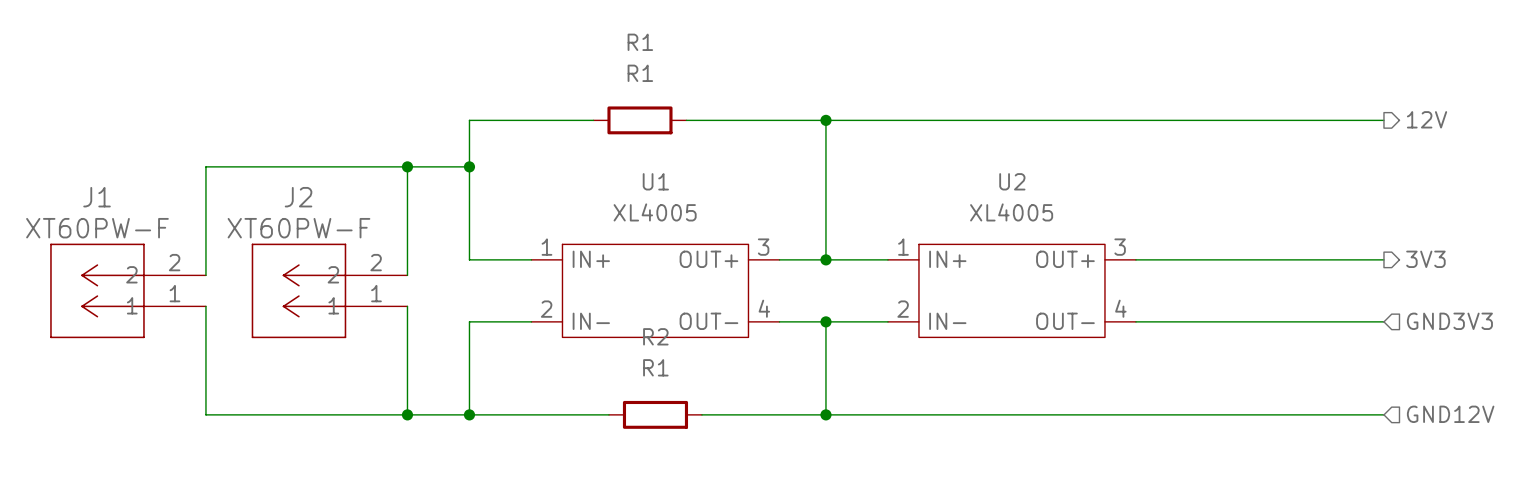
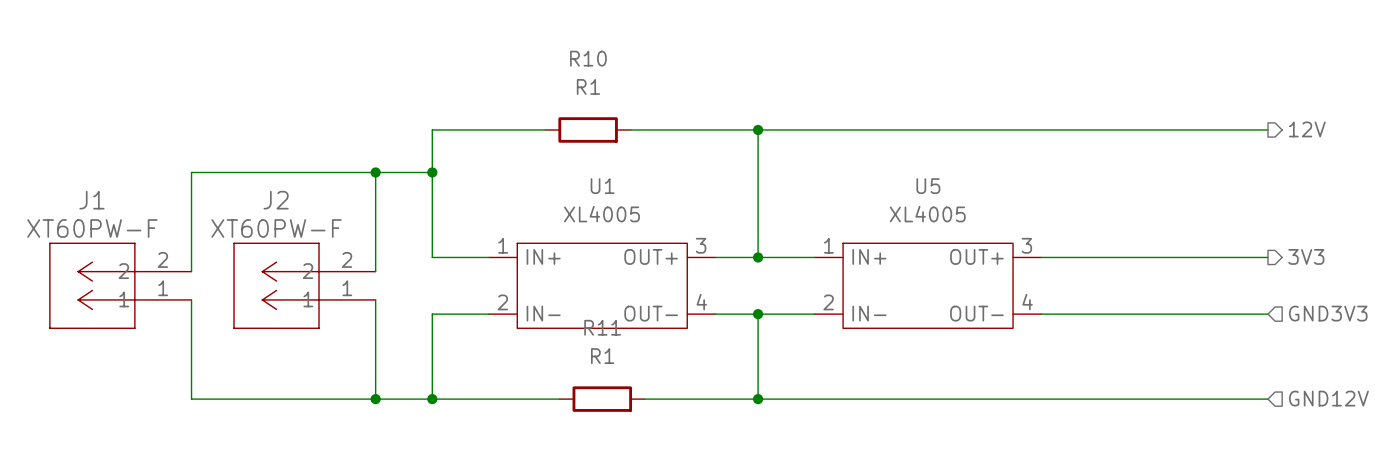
R1 name: R1 (640, 42) -> R10 (588, 58)
U2 name: U2 (1012, 181) -> U5 (928, 186)
R2 name: R2 (655, 336) -> R11 (602, 327)

